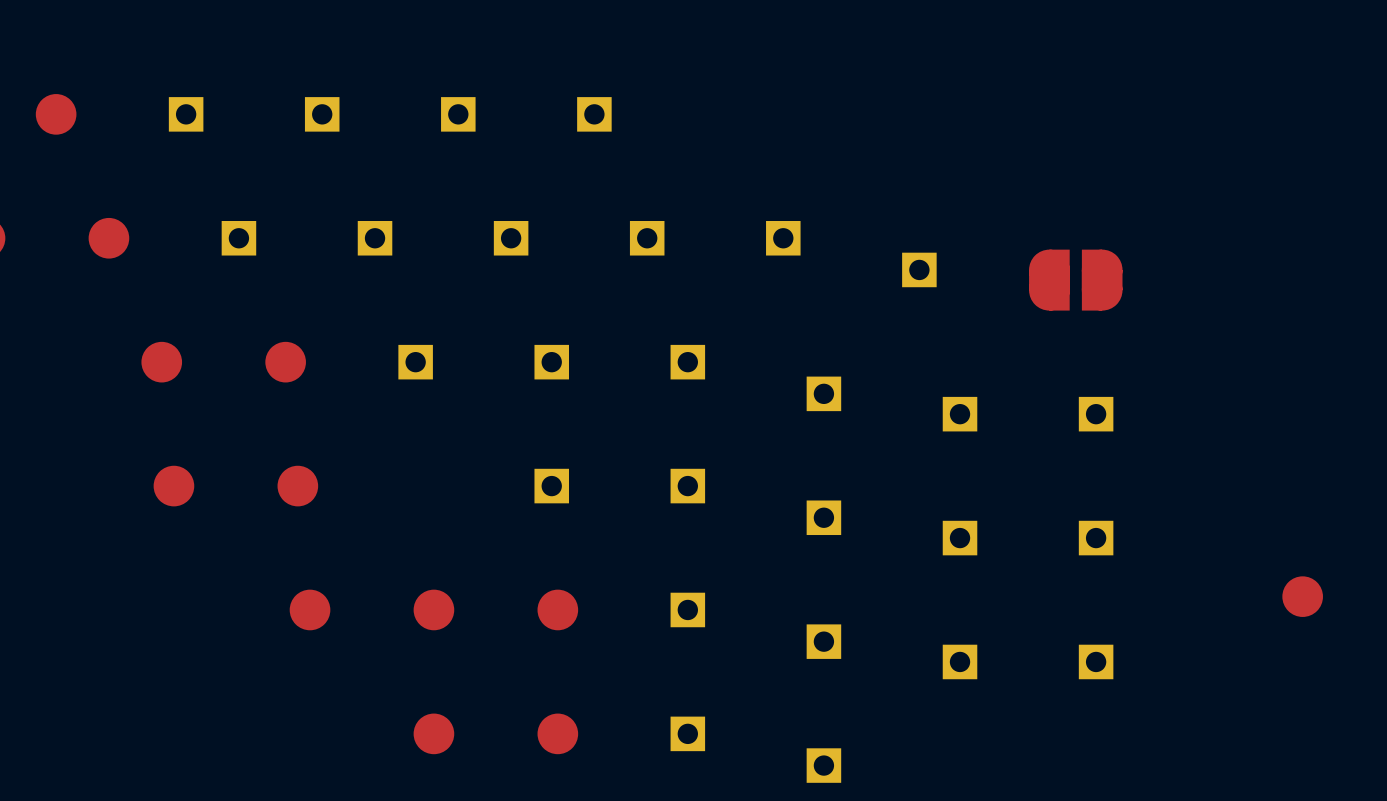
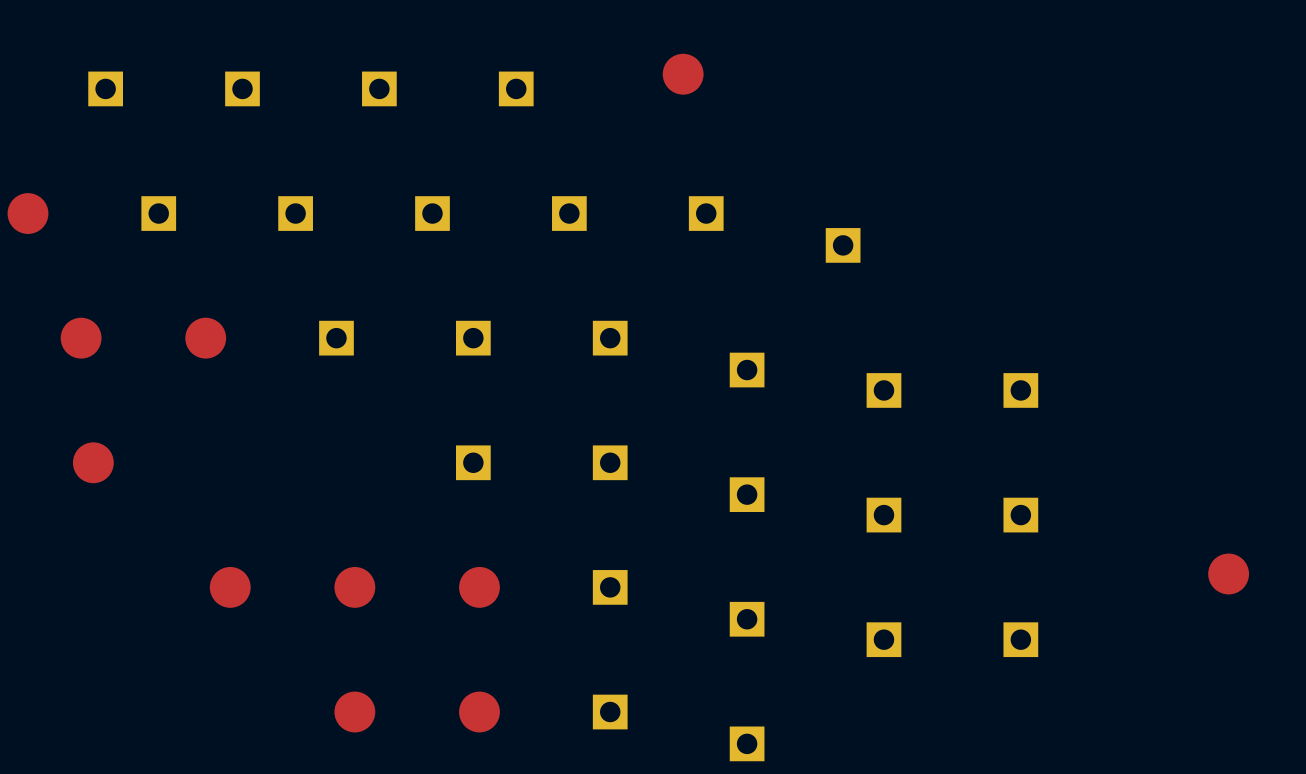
part: (1075, 280) -> none
part position: (297, 486) -> (683, 74)

